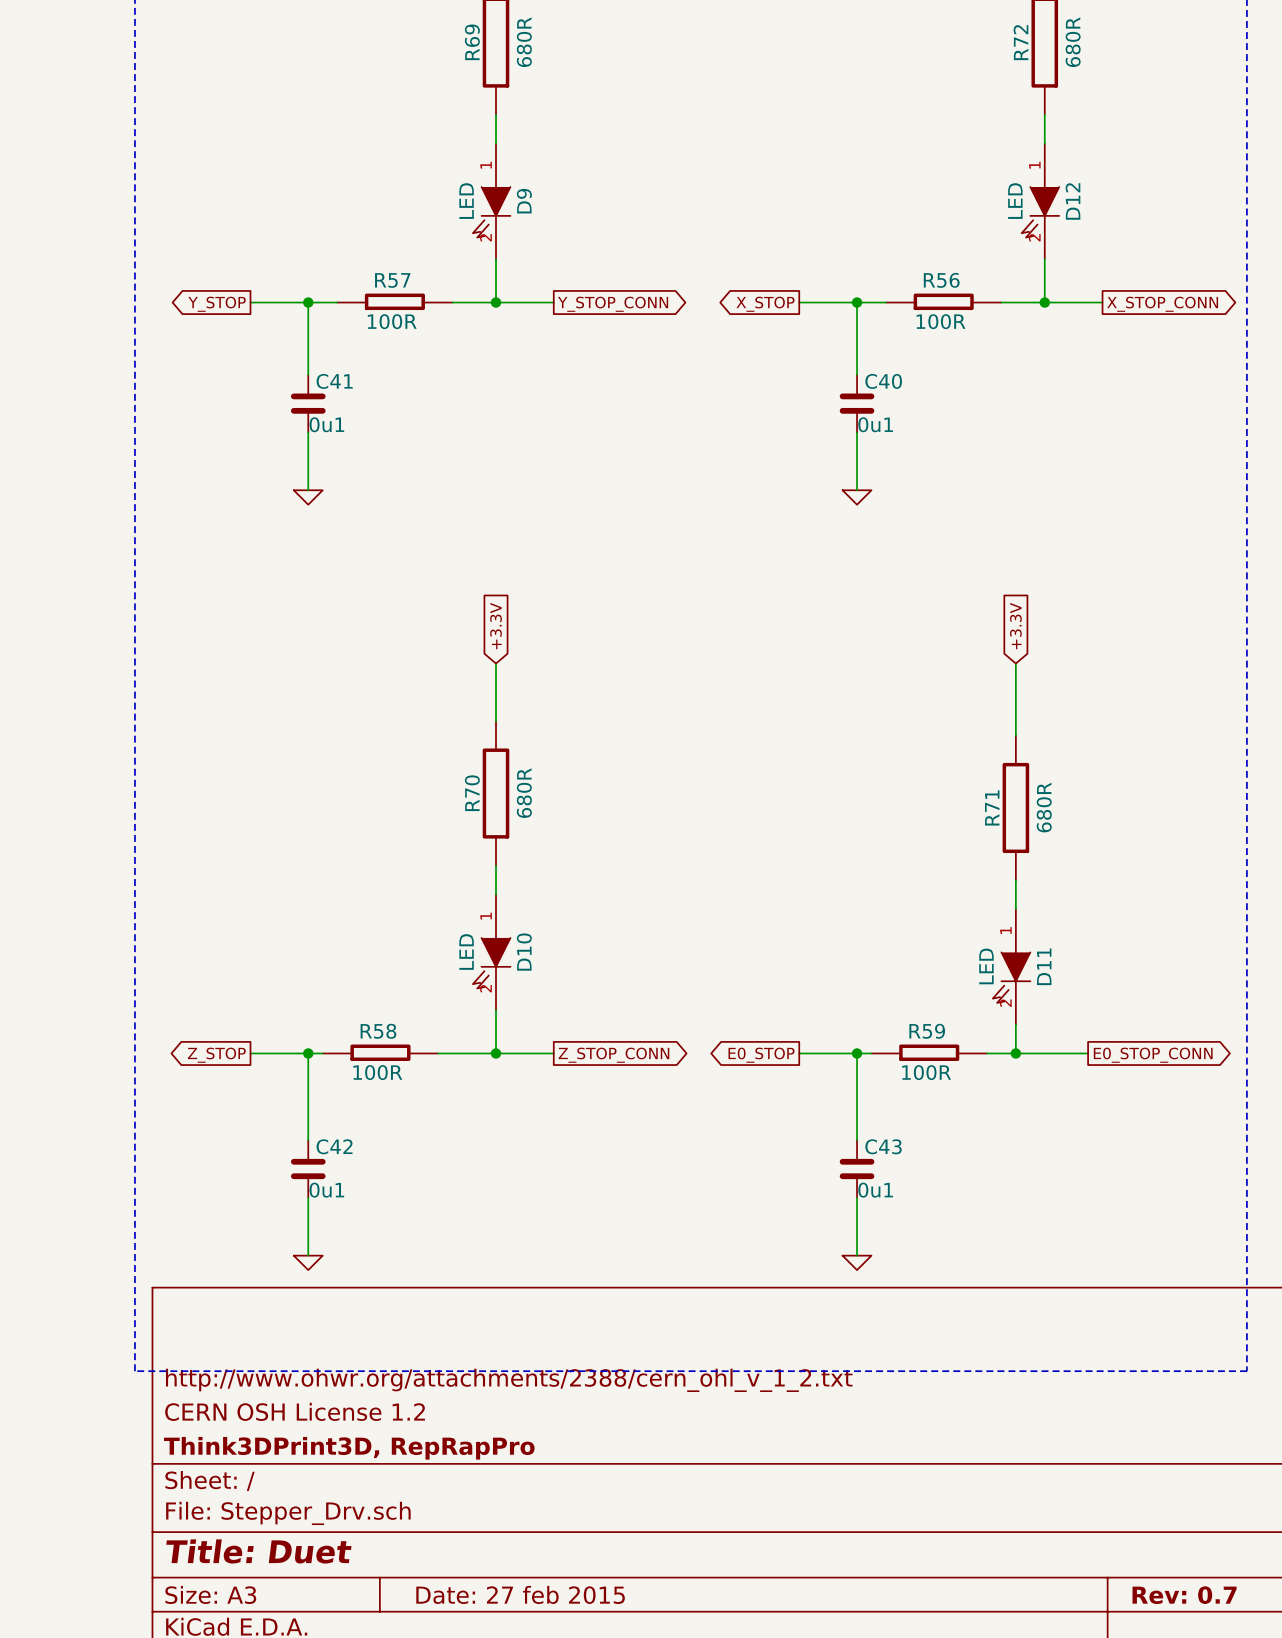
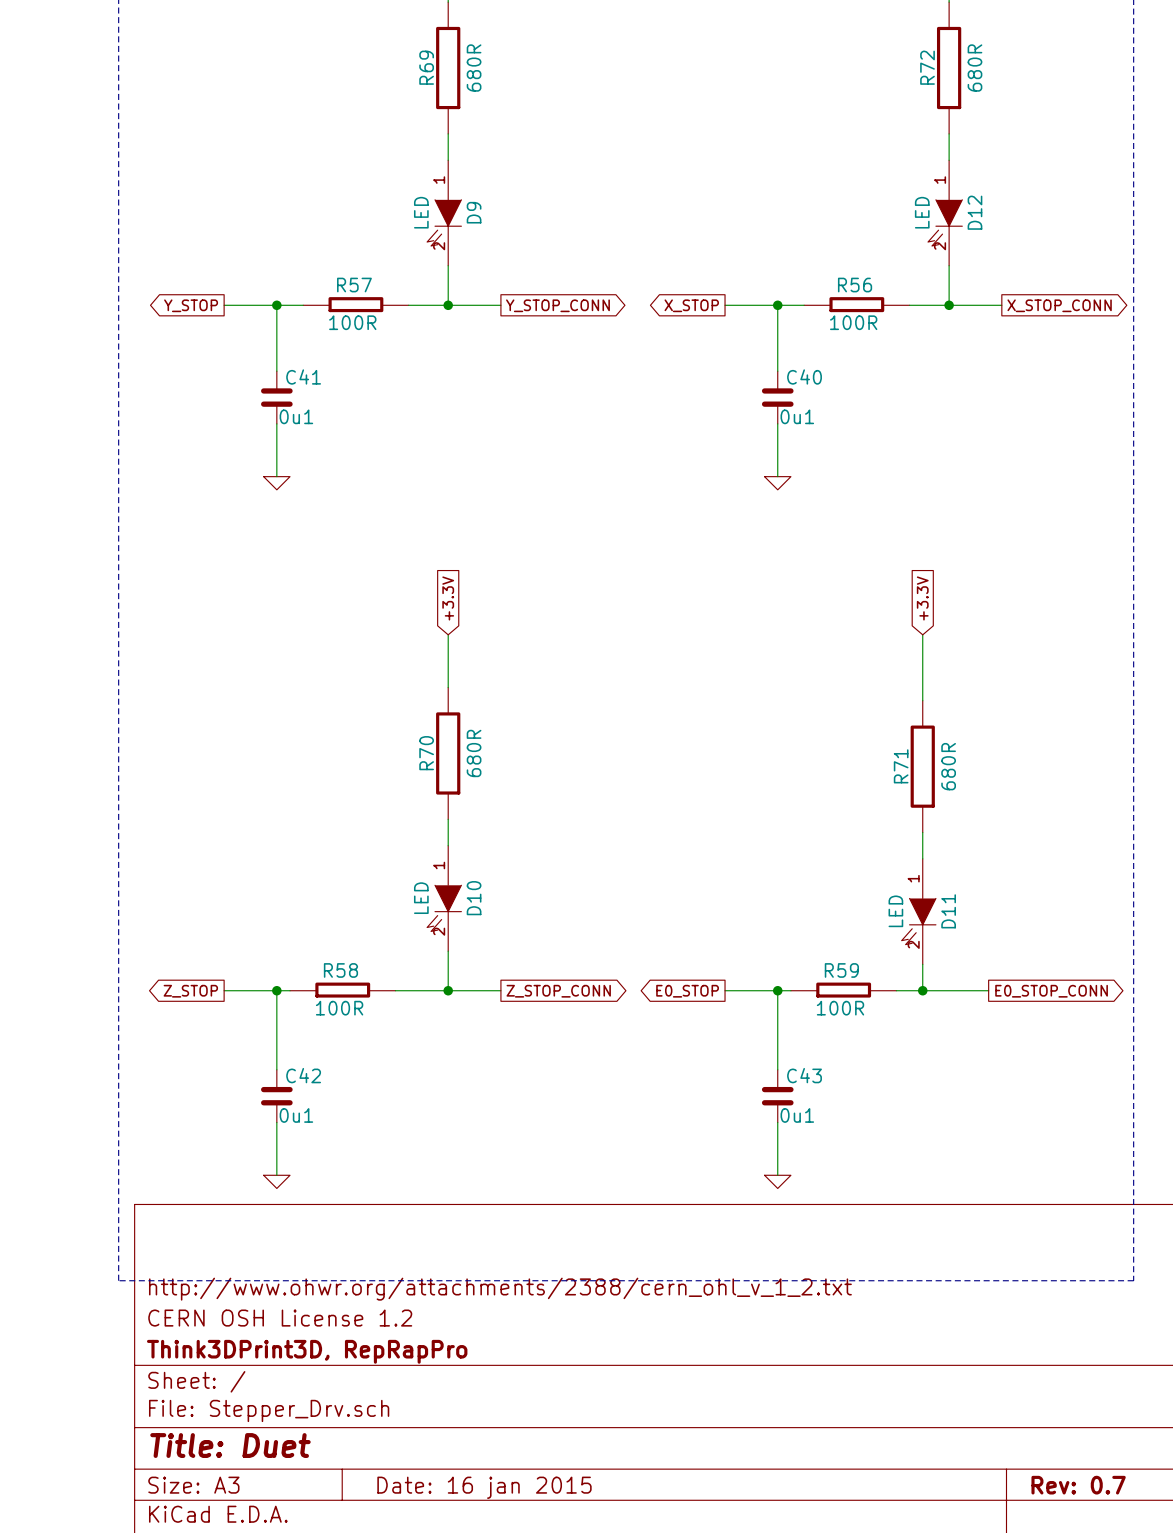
title block: Date: 27 feb 2015 (520, 1594) -> Date: 16 jan 2015 (484, 1487)

